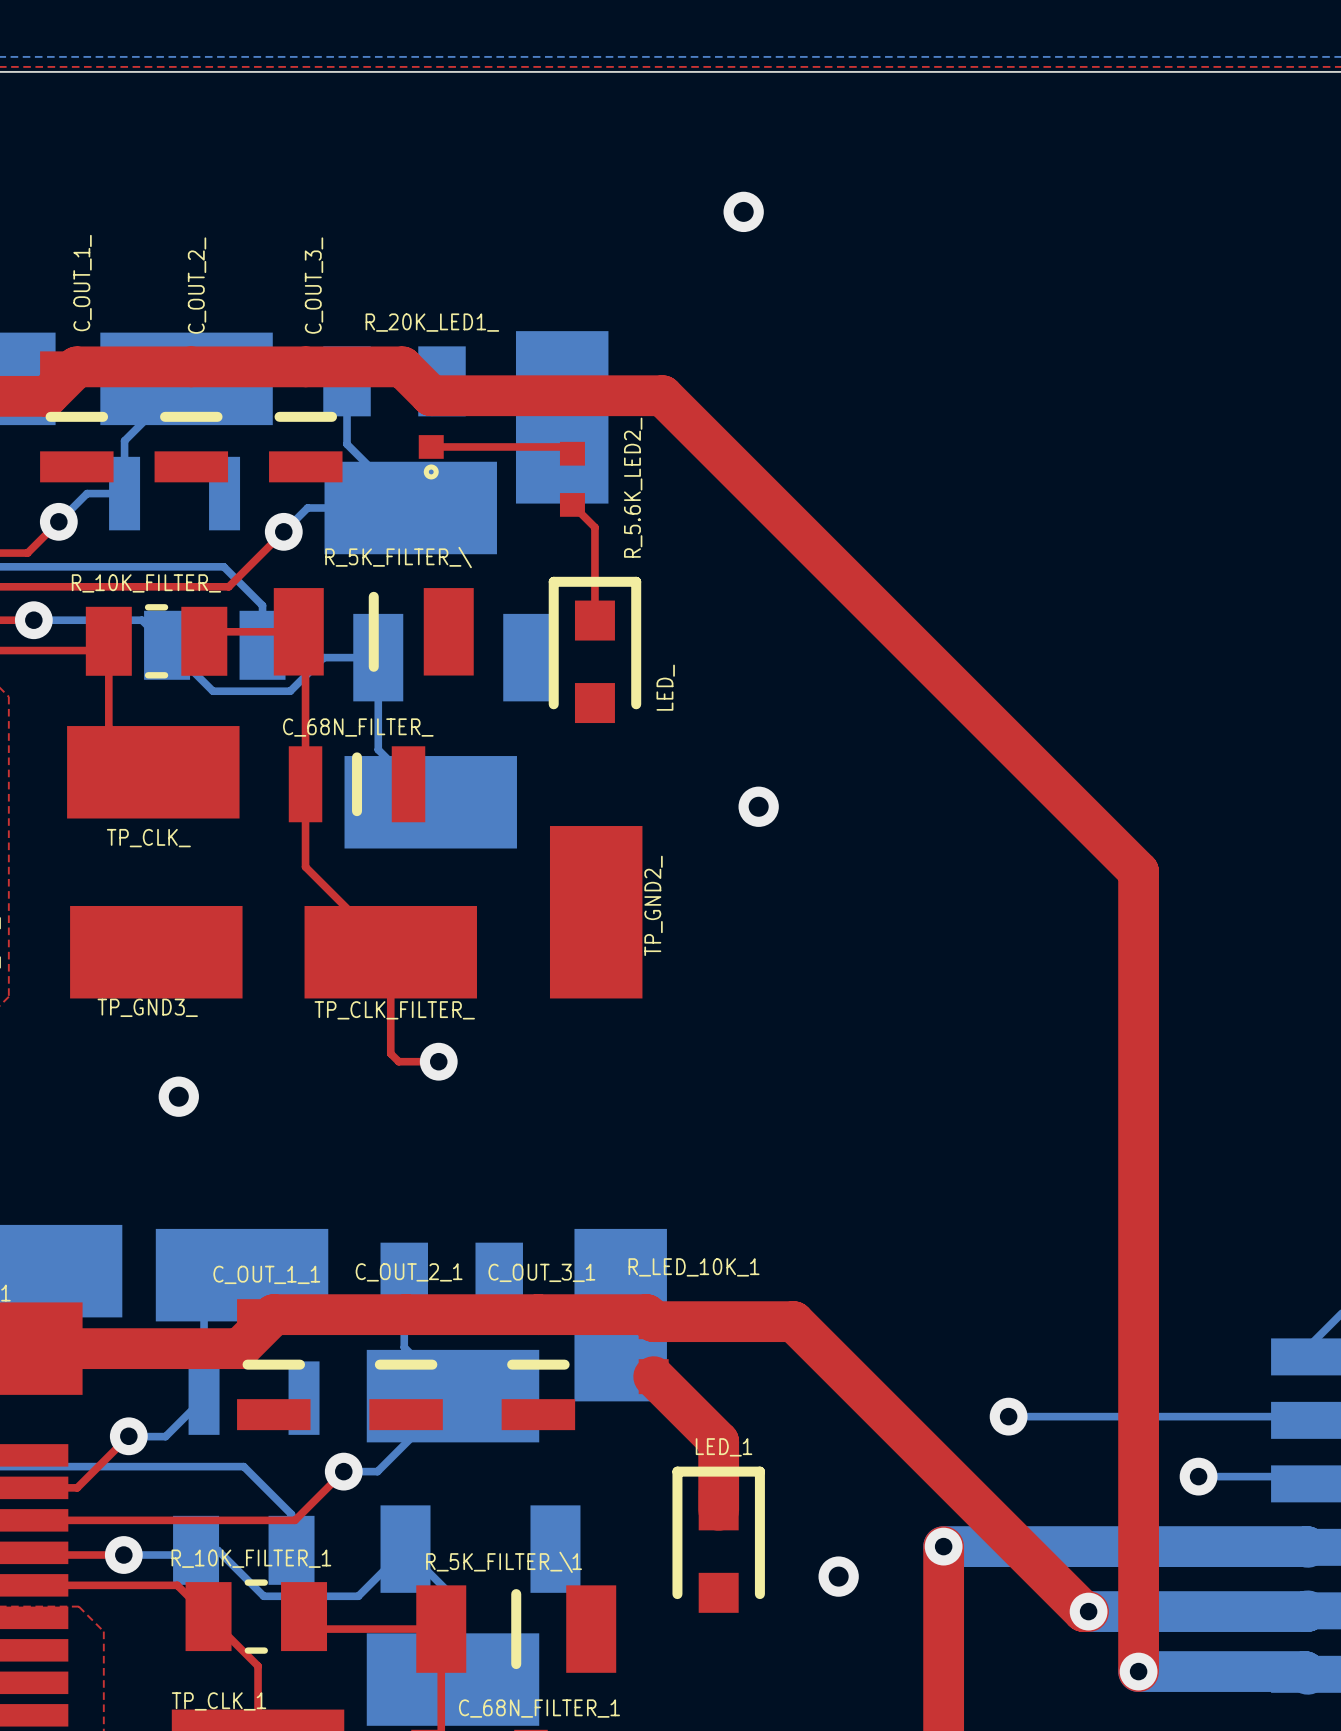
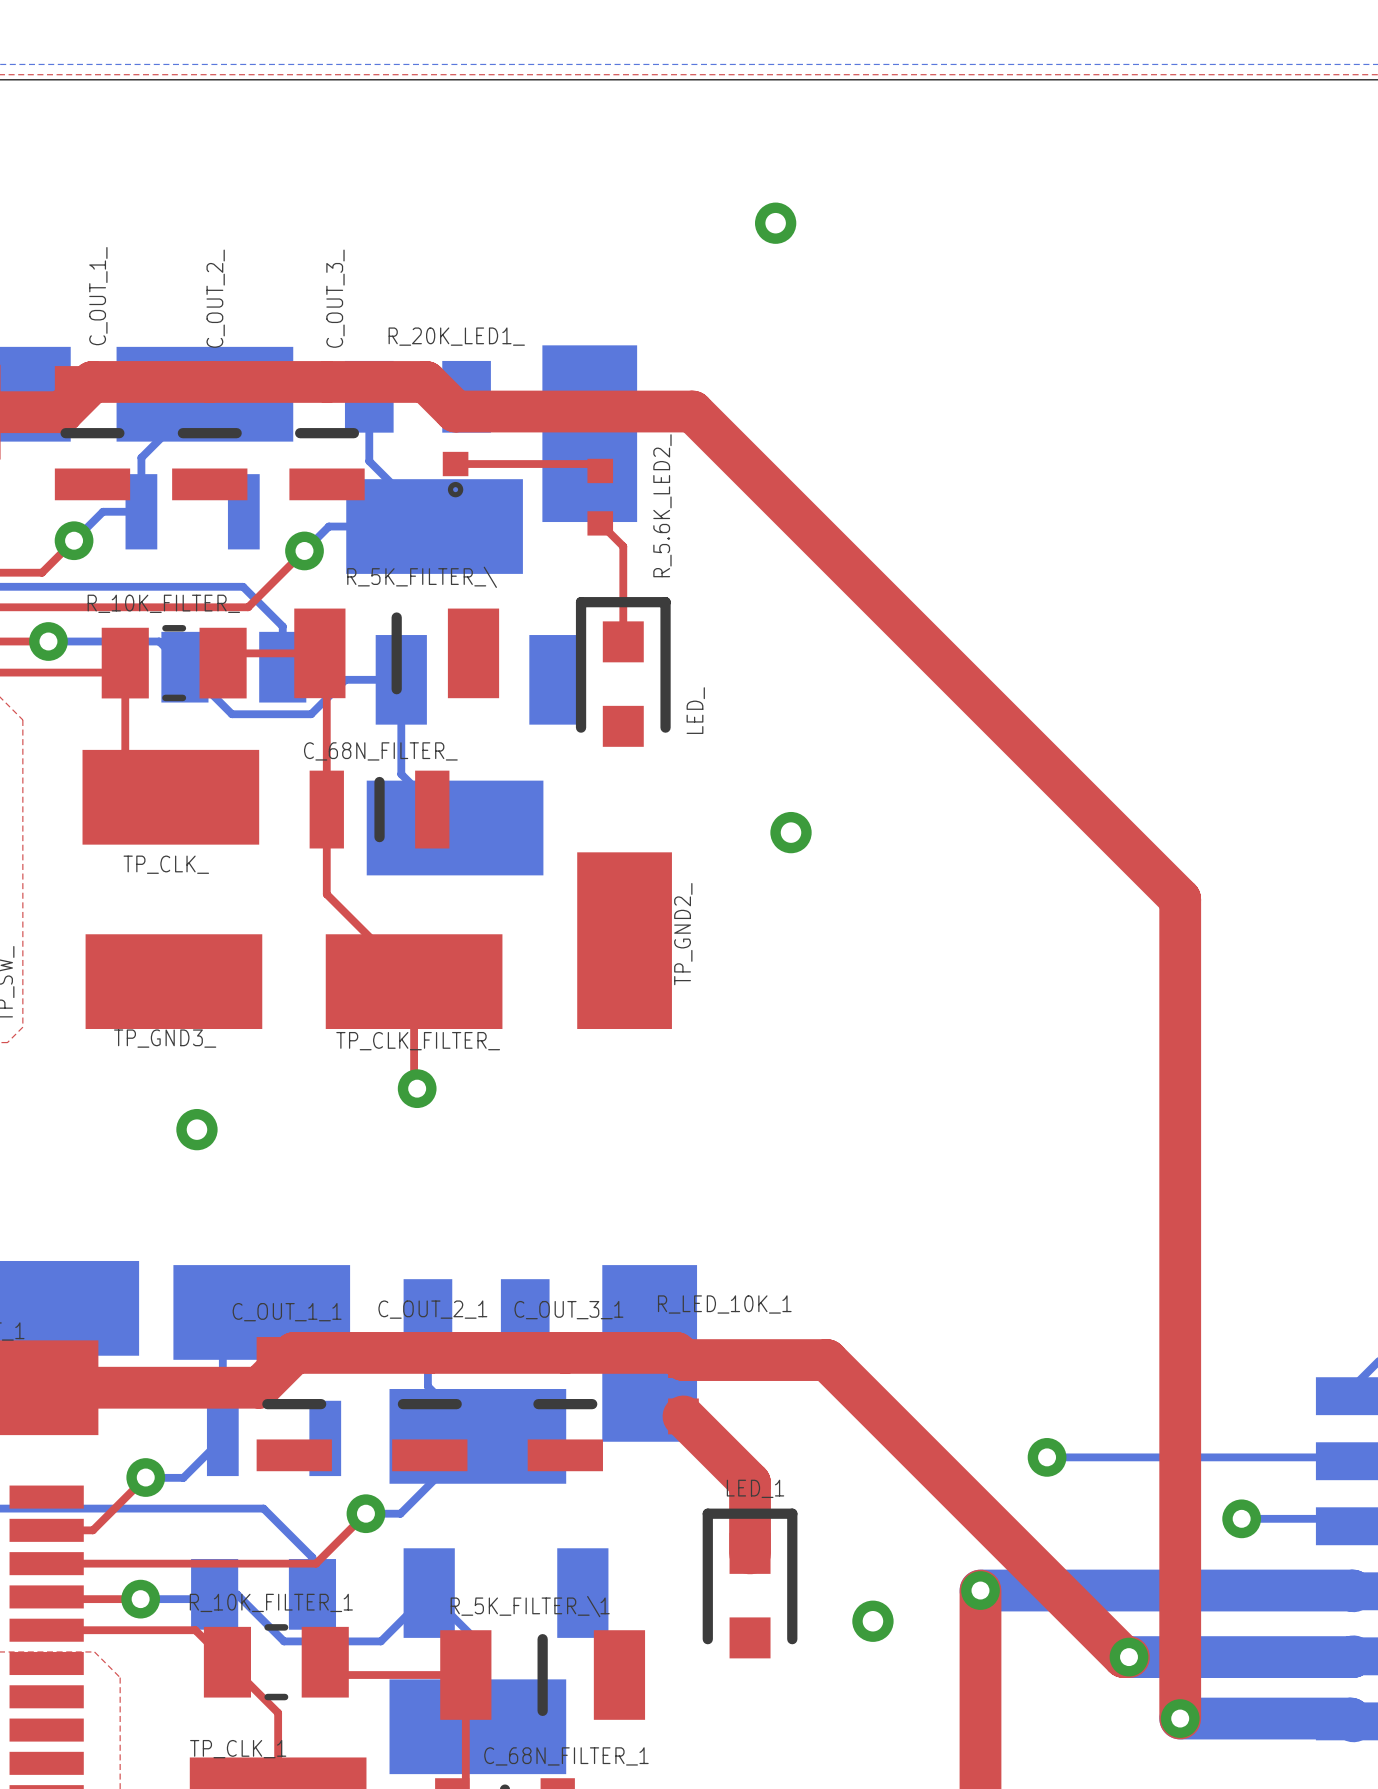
top track: (393, 1056) (398, 1061) (438, 1061) -> none
via: none -> (417, 1088)
via: (438, 1061) -> none

